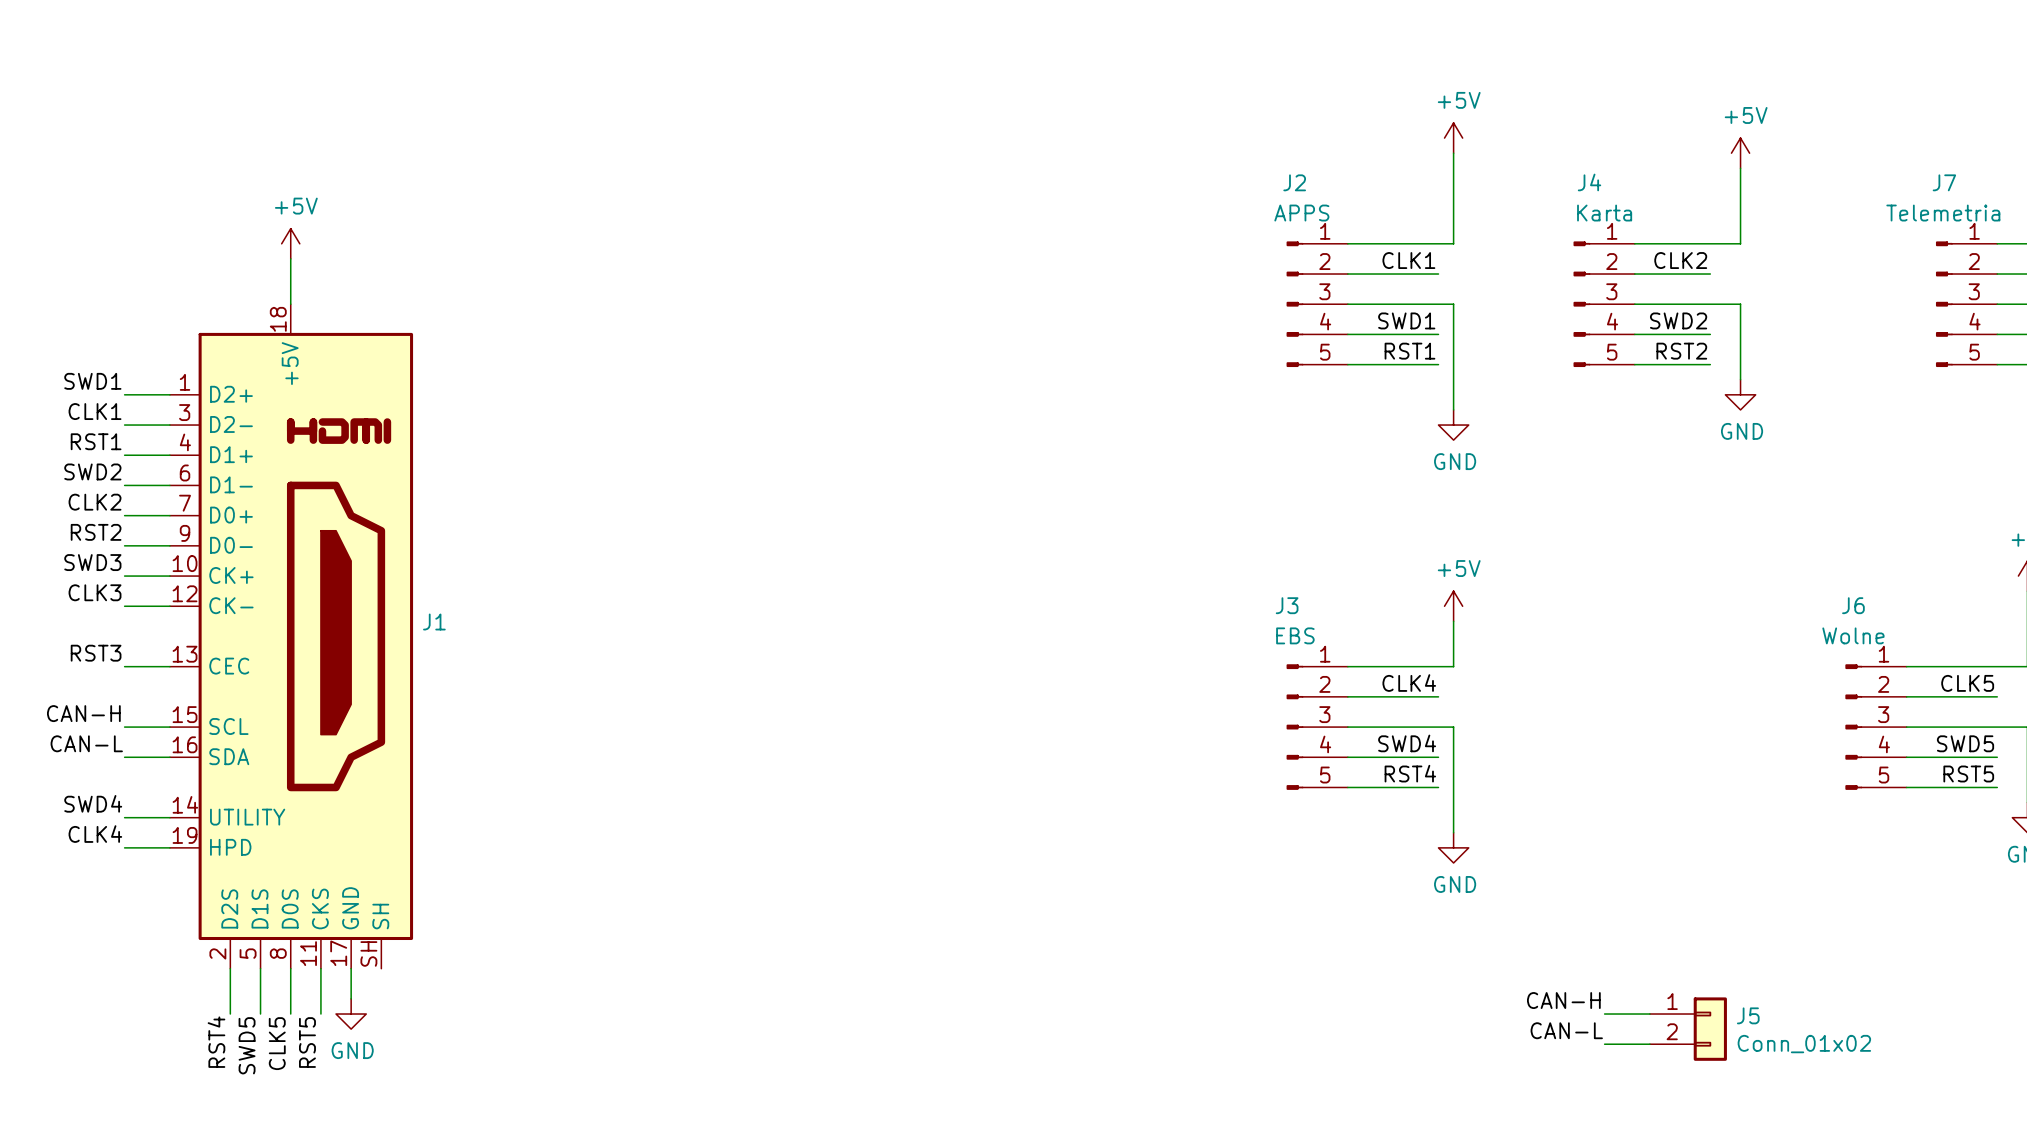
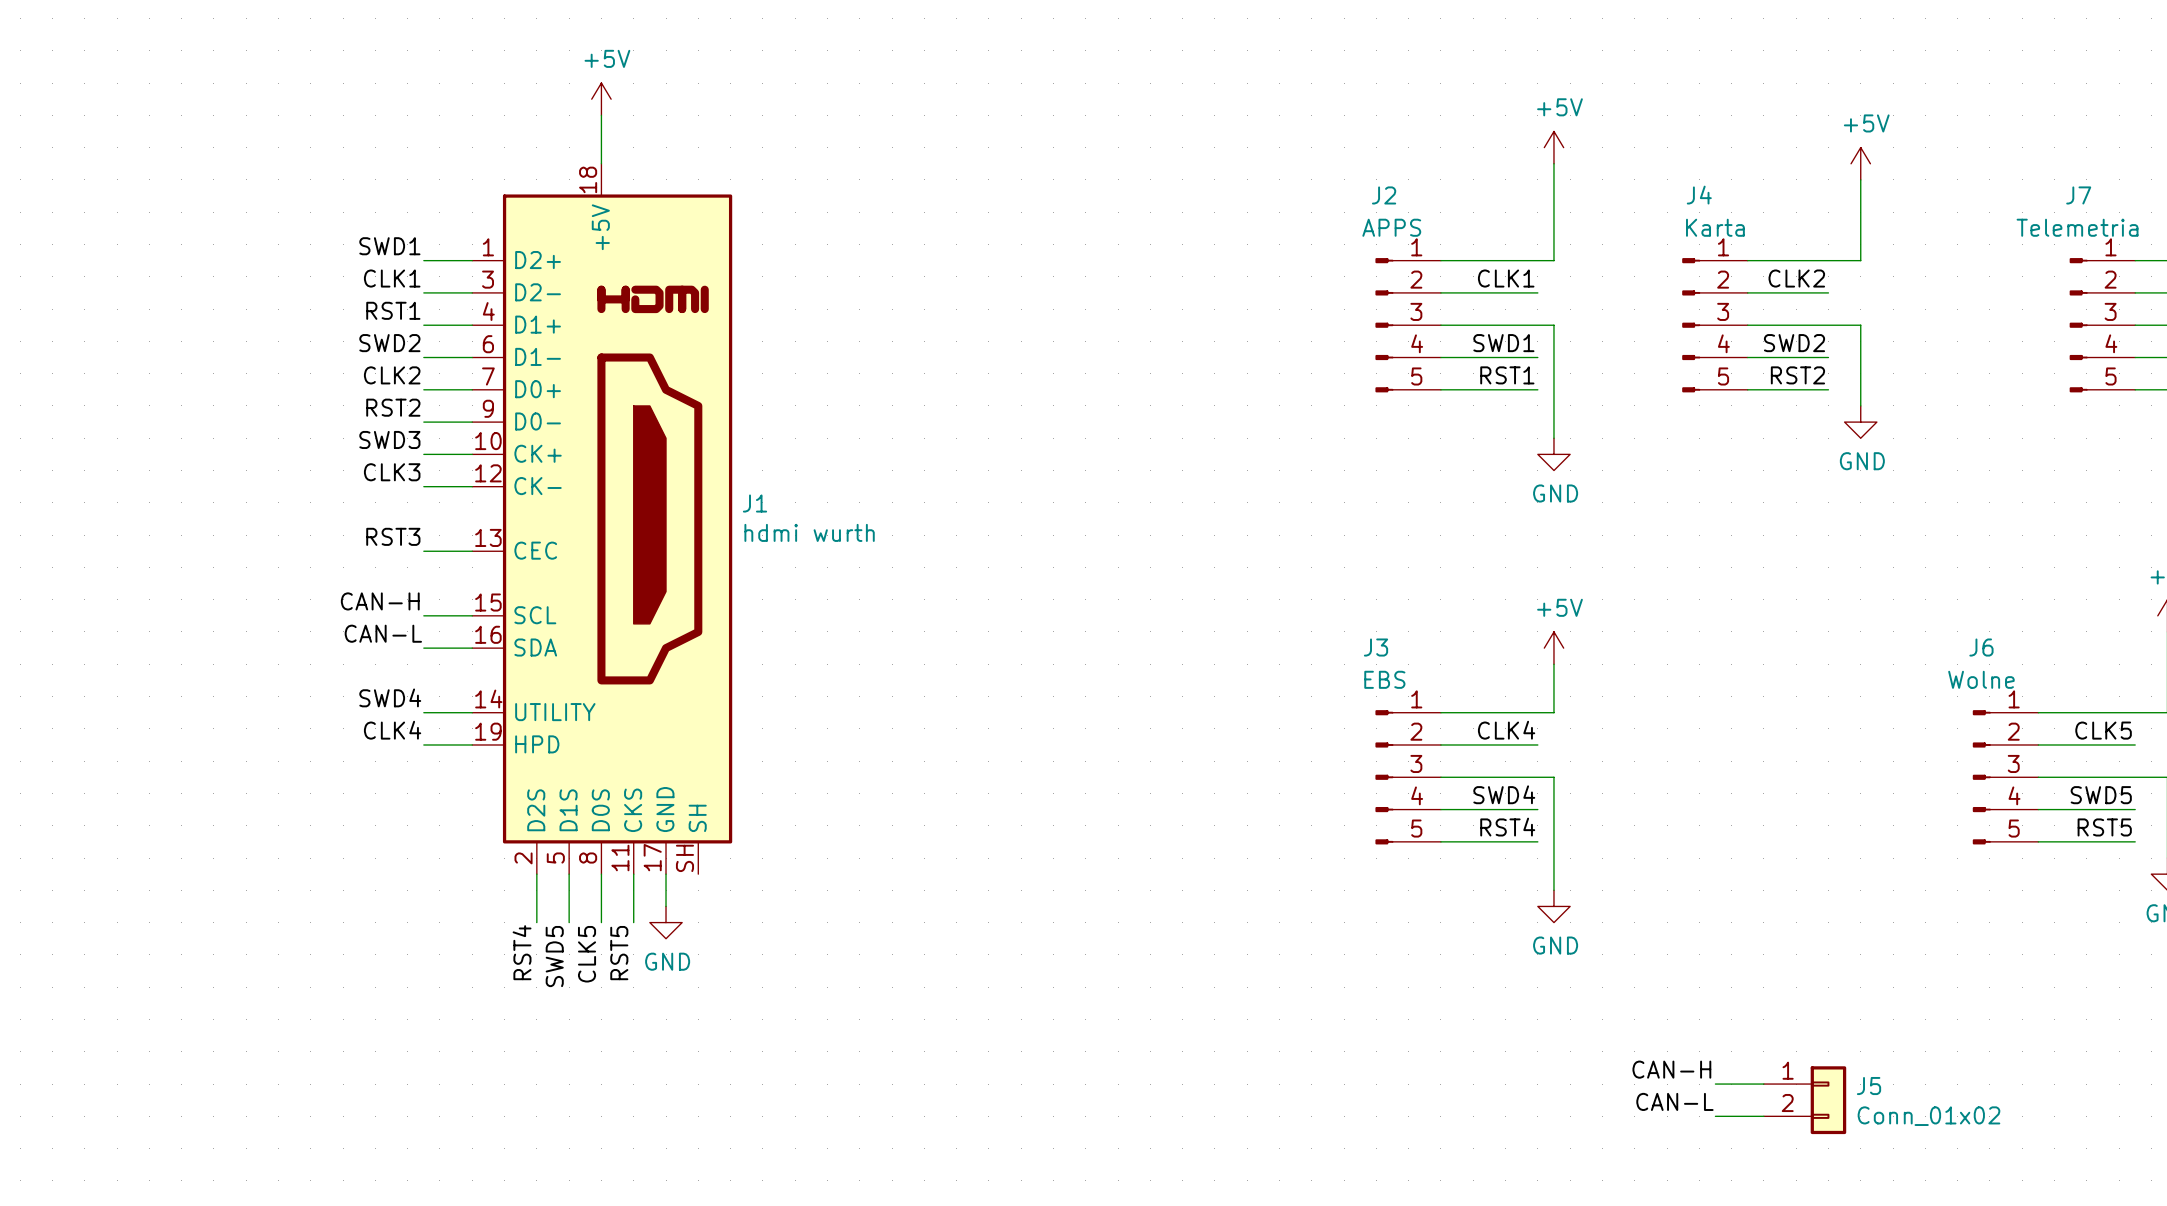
power symbol: none -> +5V (601, 99)
wire: none -> (601, 115) (601, 163)
label: none -> SWD1 (389, 246)
power symbol: +5V (290, 243) -> none
wire: none -> (423, 260) (472, 260)
wire: (290, 258) (290, 304) -> none
label: none -> CLK1 (392, 278)
wire: none -> (423, 292) (472, 292)
label: none -> RST1 (393, 310)
wire: none -> (423, 325) (472, 325)
label: none -> SWD2 (389, 343)
label: none -> CLK2 (392, 375)
label: SWD1 (92, 381) -> none
label: none -> RST2 (393, 407)
wire: (124, 394) (169, 394) -> (423, 357) (472, 357)
label: CLK1 (95, 411) -> none
label: none -> SWD3 (389, 439)
wire: (124, 425) (169, 425) -> (423, 389) (472, 389)
label: RST1 (96, 441) -> none
label: none -> CLK3 (392, 472)
wire: (124, 455) (169, 455) -> (423, 422) (472, 422)
label: SWD2 (92, 471) -> none
wire: (124, 485) (169, 485) -> (423, 454) (472, 454)
J1 value: none -> hdmi wurth (809, 532)
label: CLK2 (95, 502) -> none
label: none -> RST3 (393, 536)
wire: (124, 515) (169, 515) -> (423, 486) (472, 486)
label: RST2 (96, 532) -> none
wire: (124, 545) (169, 545) -> none
label: SWD3 (92, 562) -> none
label: none -> CAN-H (380, 601)
wire: (124, 576) (169, 576) -> (423, 551) (472, 551)
label: CLK3 (95, 592) -> none
label: none -> CAN-L (383, 633)
wire: (124, 606) (169, 606) -> (423, 615) (472, 615)
J1 position: (291, 636) -> (602, 518)
label: none -> SWD4 (390, 697)
label: RST3 (96, 653) -> none
wire: (124, 666) (169, 666) -> (423, 648) (472, 648)
label: none -> CLK4 (392, 730)
label: CAN-H (83, 713) -> none
wire: (124, 727) (169, 727) -> (423, 712) (472, 712)
label: CAN-L (86, 743) -> none
wire: (124, 757) (169, 757) -> (423, 744) (472, 744)
label: SWD4 (93, 803) -> none
wire: (124, 817) (169, 817) -> none
wire: none -> (633, 874) (633, 922)
wire: none -> (666, 874) (666, 906)
label: CLK4 (95, 834) -> none
wire: (124, 847) (169, 847) -> none
power symbol: none -> GND (666, 922)
label: none -> RST4 (522, 952)
label: none -> RST5 (619, 953)
label: none -> CLK5 (587, 954)
label: none -> SWD5 (554, 956)
wire: (230, 968) (230, 1014) -> none
wire: (260, 968) (260, 1014) -> (536, 874) (536, 922)
wire: (290, 968) (290, 1014) -> (569, 874) (569, 922)
wire: (320, 968) (320, 1014) -> (601, 874) (601, 922)
wire: (351, 968) (351, 998) -> none
power symbol: GND (351, 1014) -> none
label: RST4 (216, 1042) -> none
label: RST5 (307, 1042) -> none
label: CLK5 (277, 1043) -> none
label: SWD5 (247, 1045) -> none

